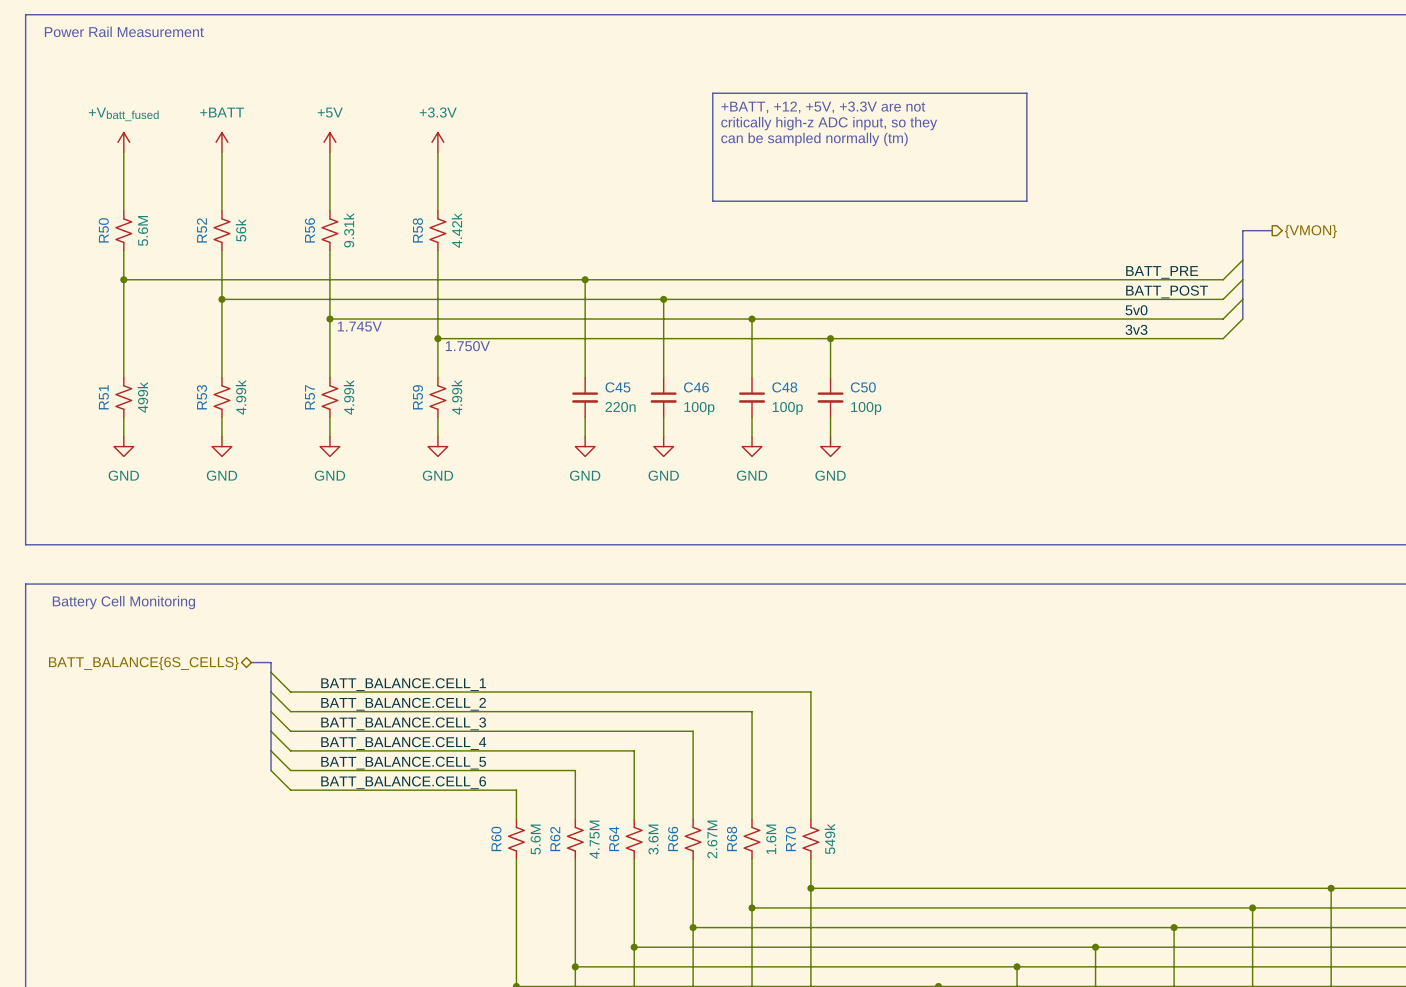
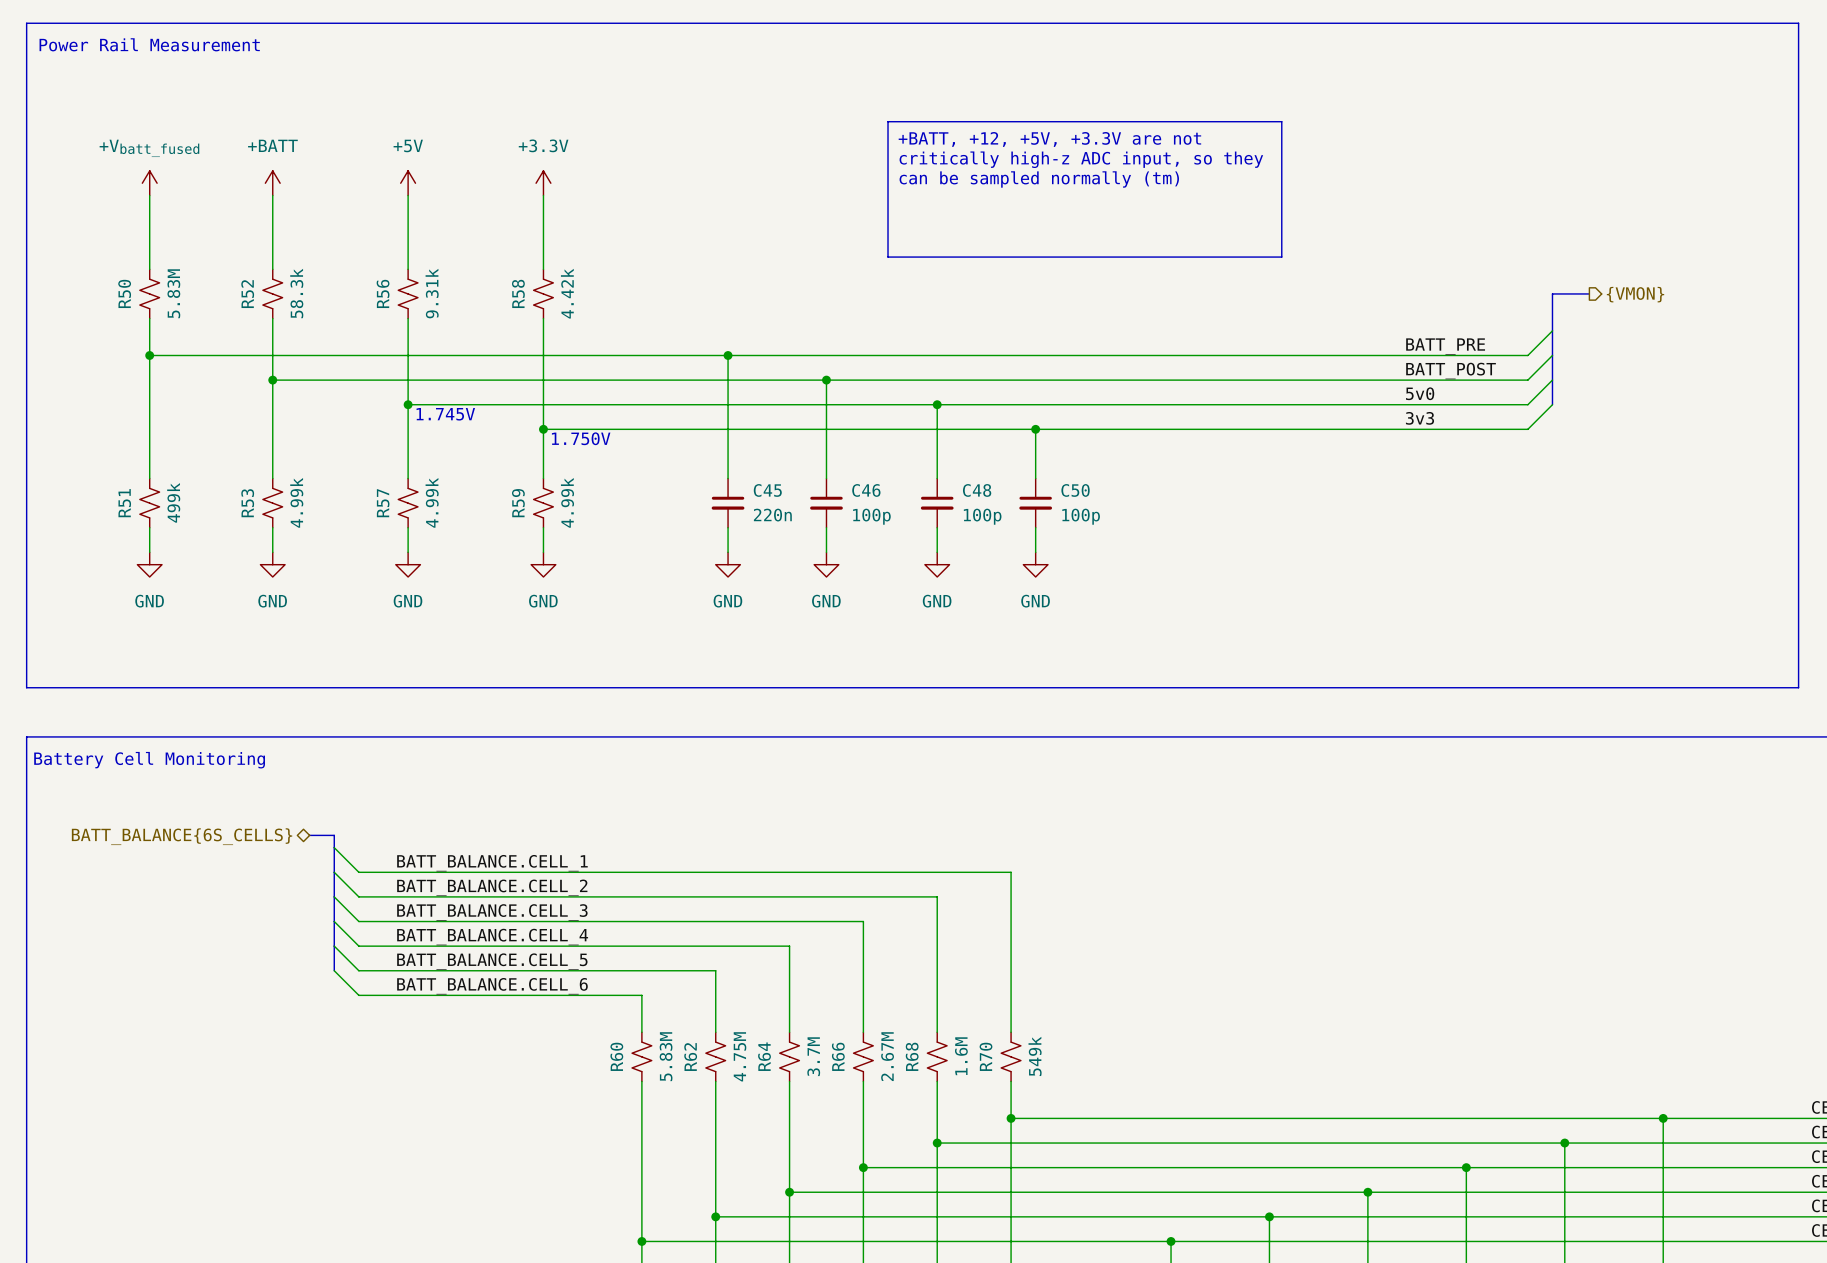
R50 value: 5.6M (143, 230) -> 5.83M (173, 293)
R52 value: 56k (241, 230) -> 58.3k (296, 293)
R60 value: 5.6M (535, 839) -> 5.83M (666, 1056)
R64 value: 3.6M (653, 839) -> 3.7M (813, 1056)

